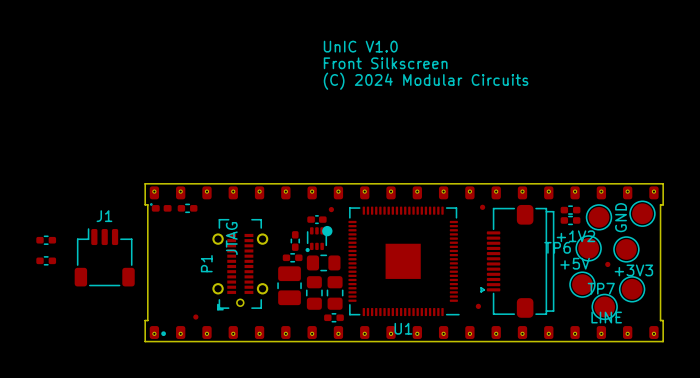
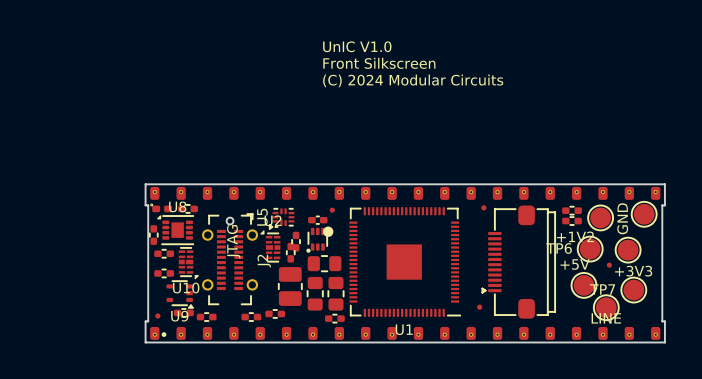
U5: none -> (281, 219)
U8: none -> (175, 230)
part: none -> (153, 235)
part: (46, 240) -> none
U2: none -> (270, 246)
part: none -> (164, 253)
J1: (104, 257) -> none
part rotation: 0° (292, 257) -> 90° clockwise (290, 252)
J2: none -> (230, 259)
part: (46, 260) -> none
U10: none -> (188, 263)
P1: (240, 264) -> none
part: none -> (164, 273)
U9: none -> (180, 294)
part: none -> (183, 312)
part: none -> (275, 313)
part: none -> (206, 317)
part: none -> (251, 317)
part position: (195, 317) -> (157, 316)

